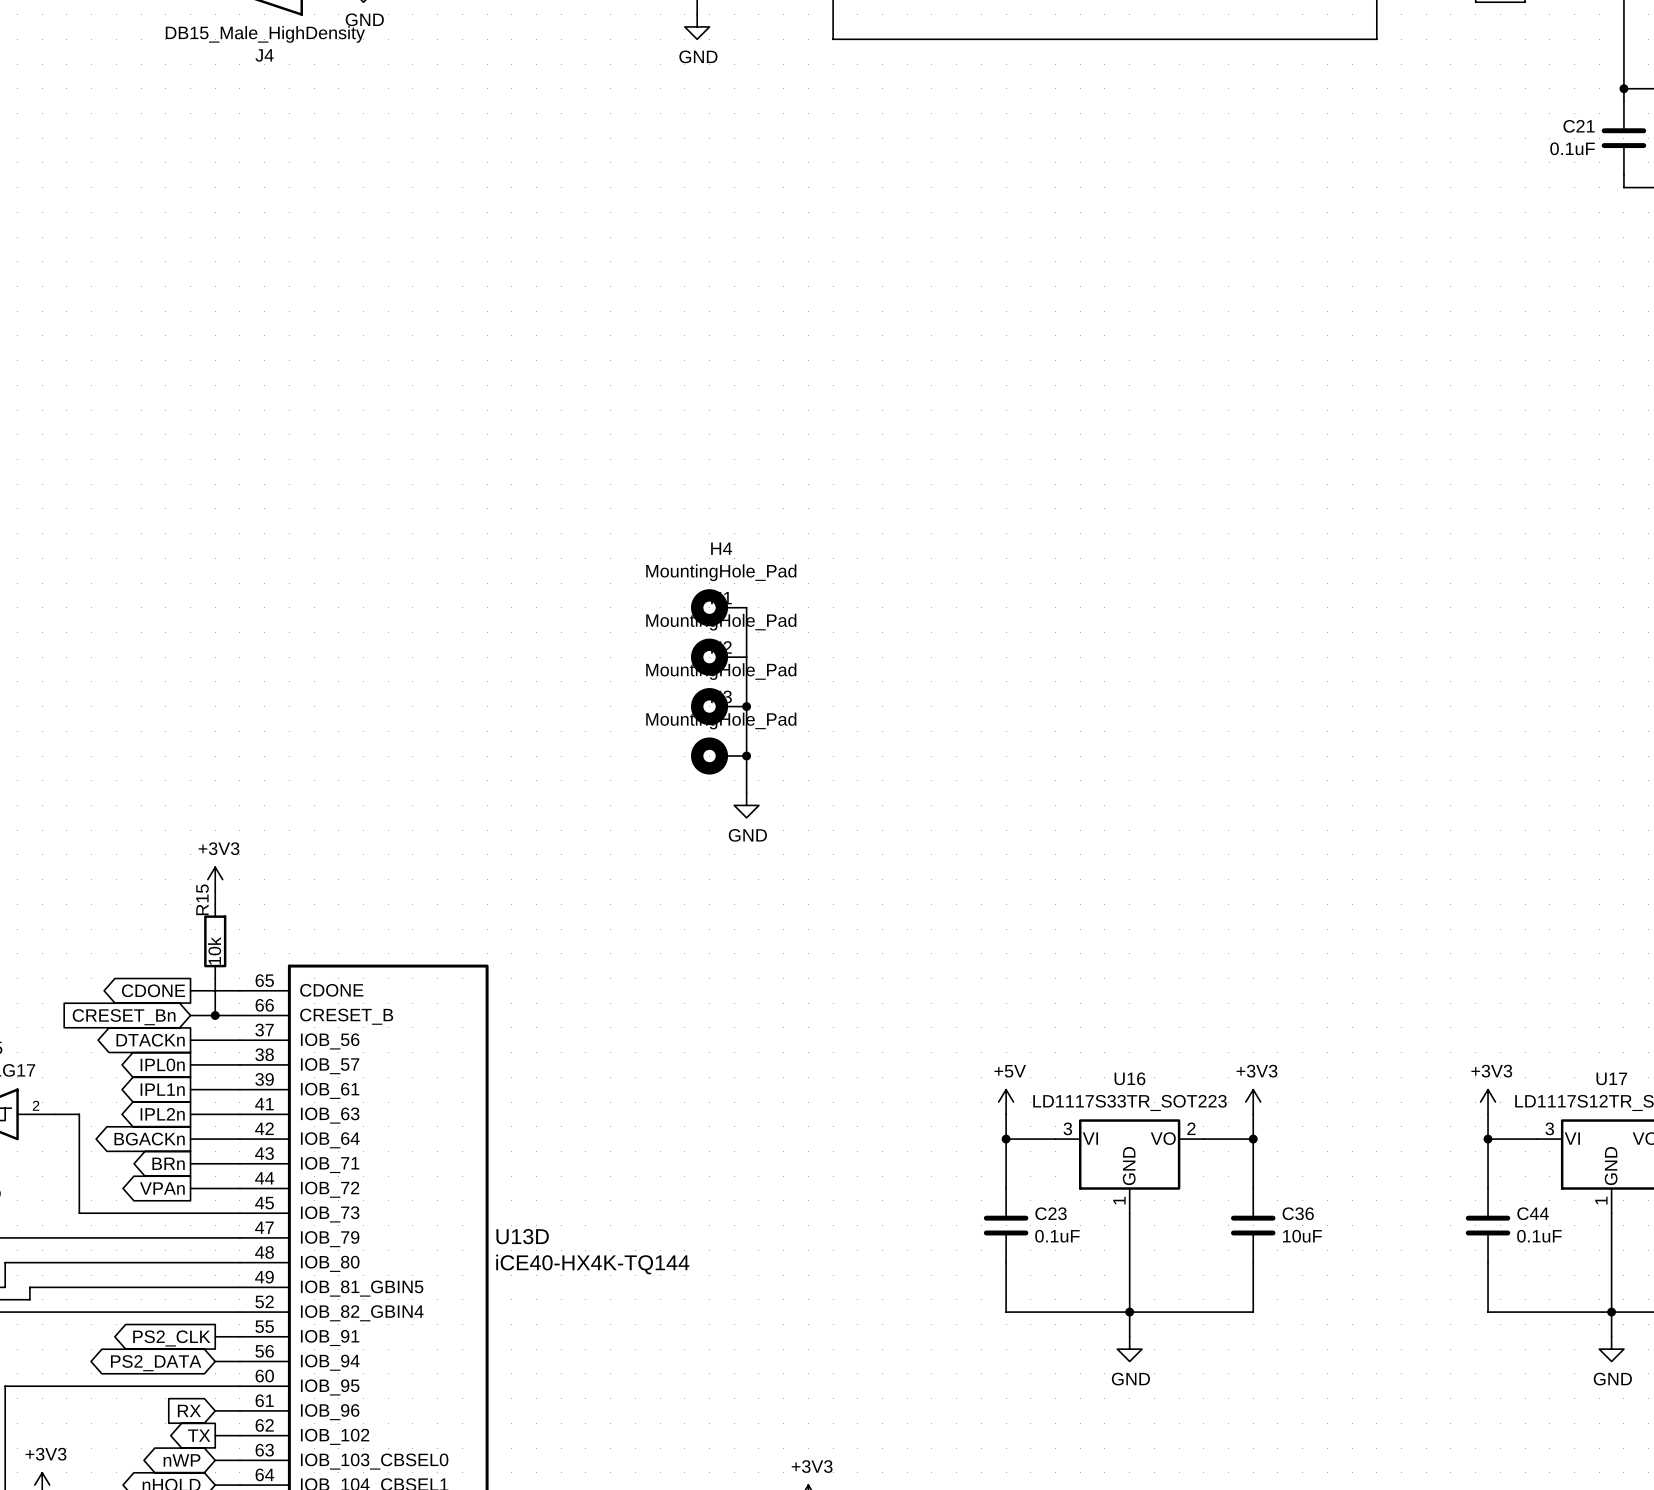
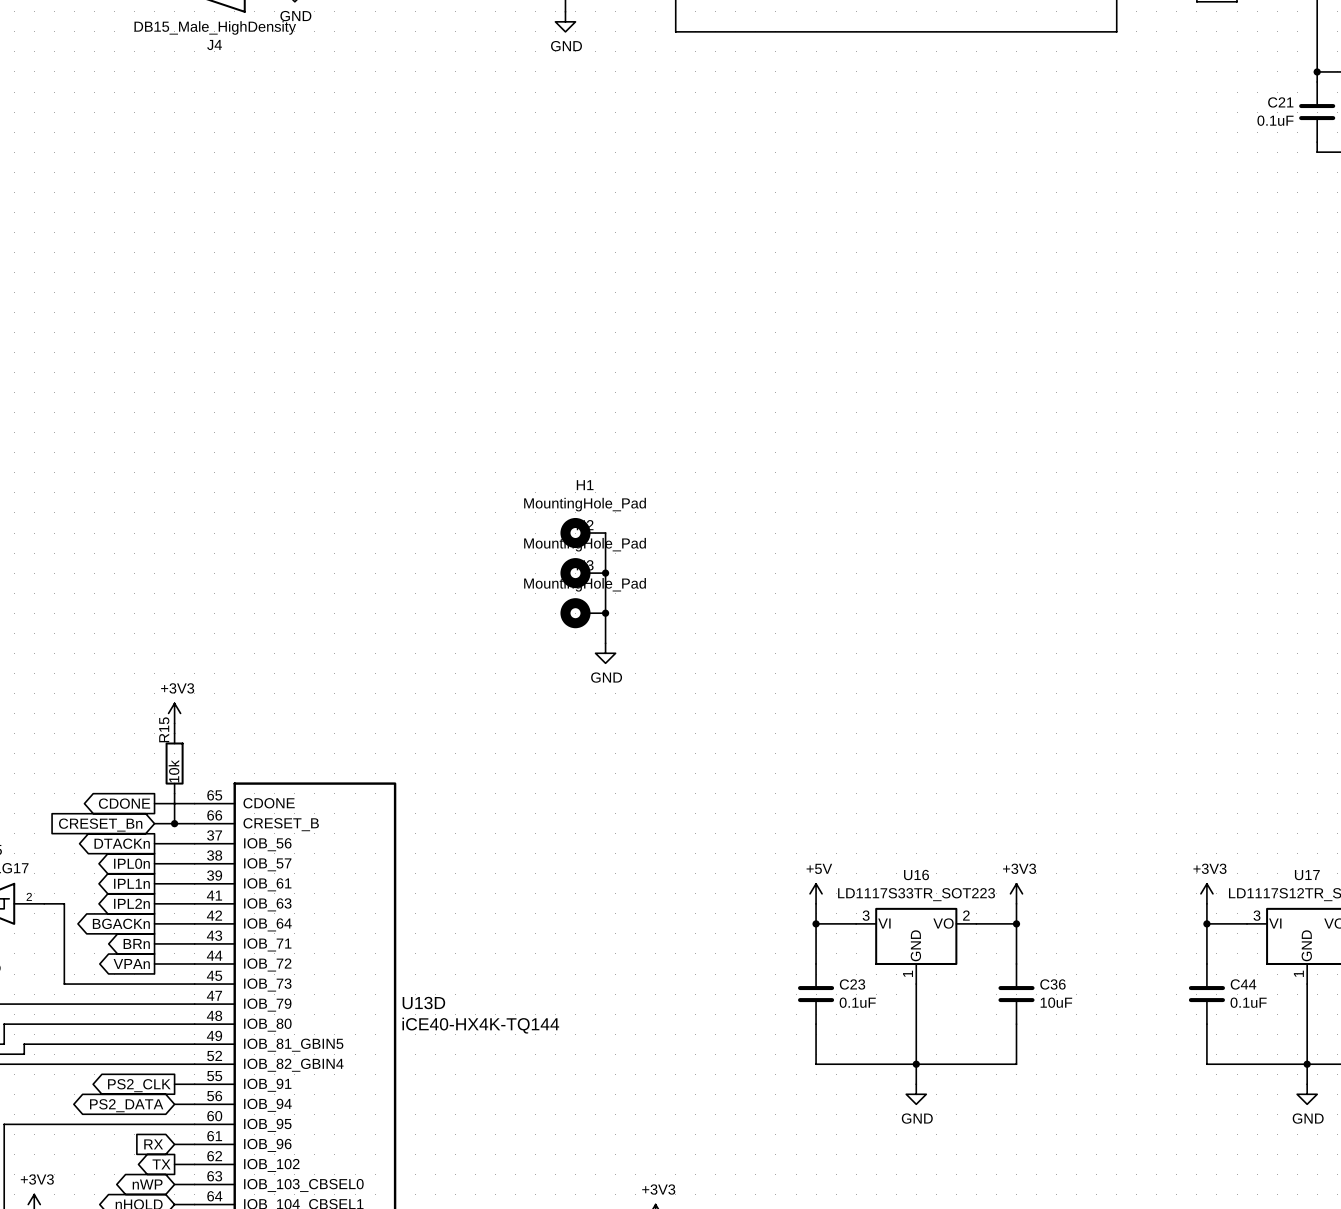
H4: MountingHole_Pad (718, 607) -> none
wire: (746, 607) (746, 657) -> none

